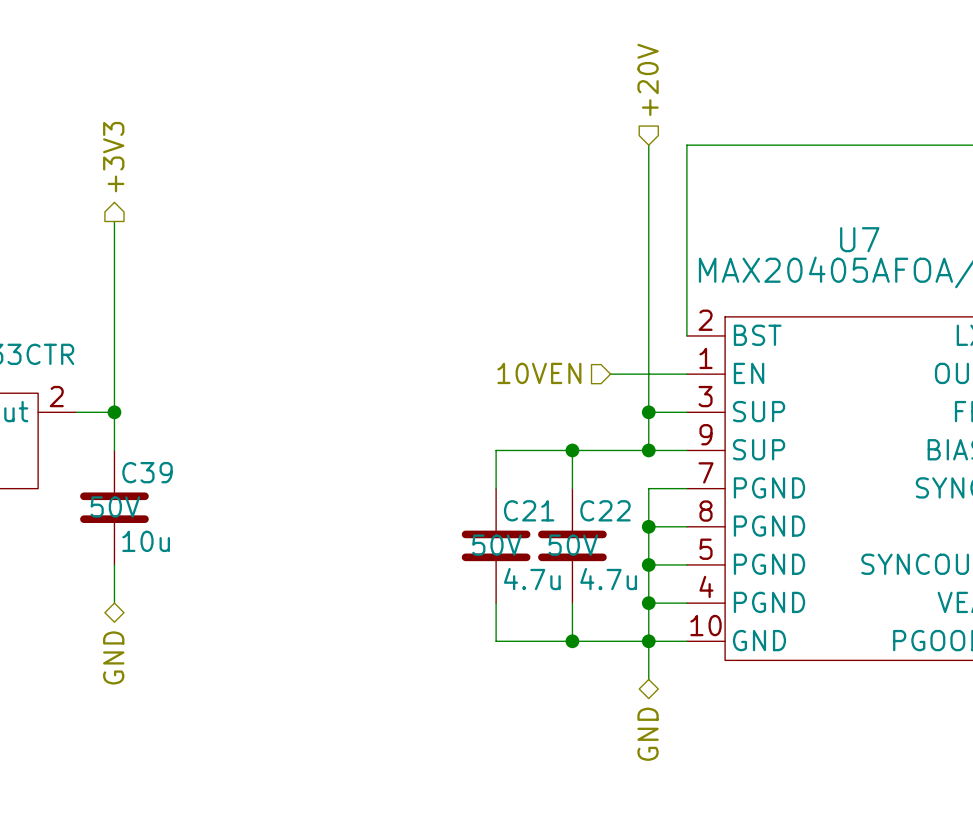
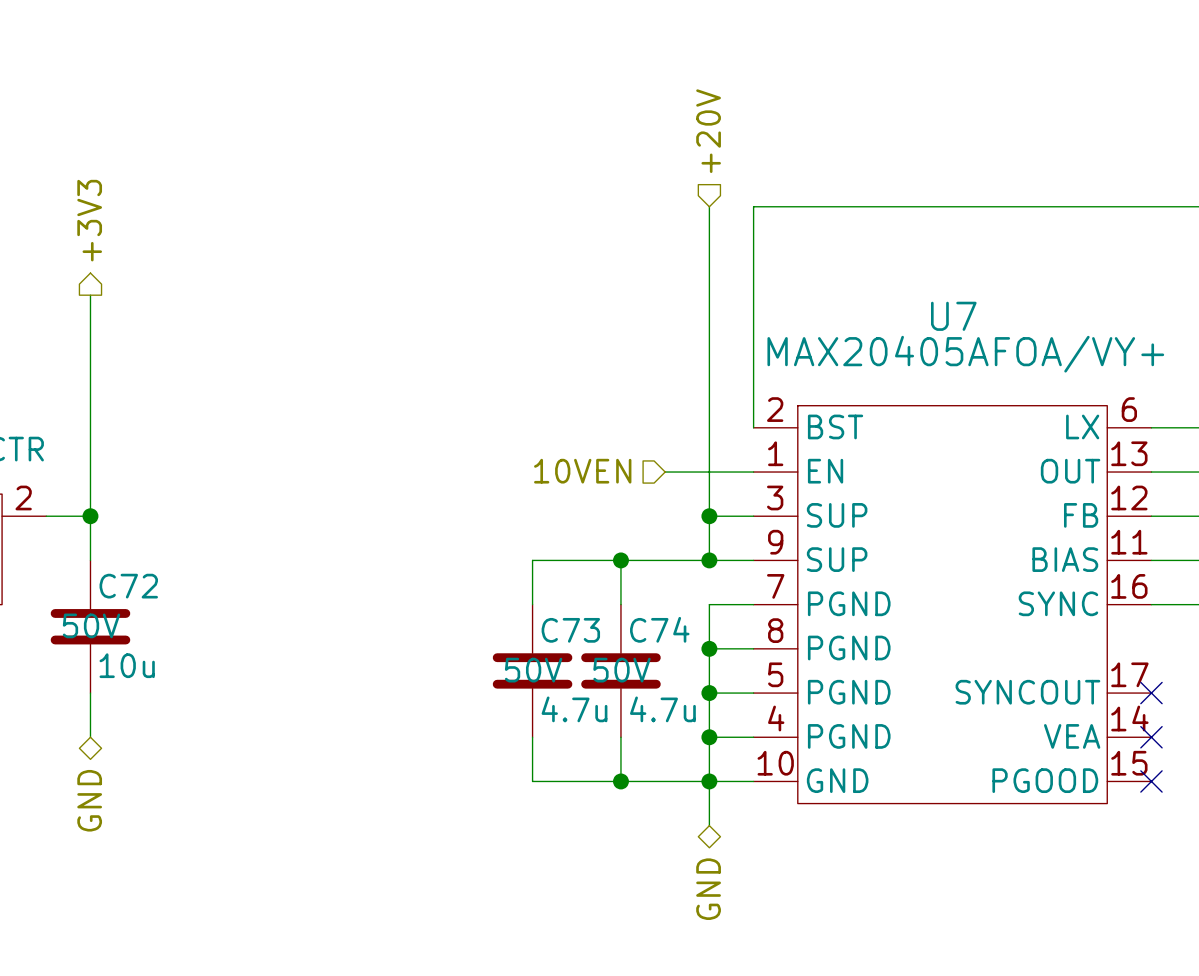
C39 name: C39 (147, 472) -> C72 (128, 586)
C21 name: C21 (529, 510) -> C73 (570, 630)
C22 name: C22 (605, 510) -> C74 (659, 629)

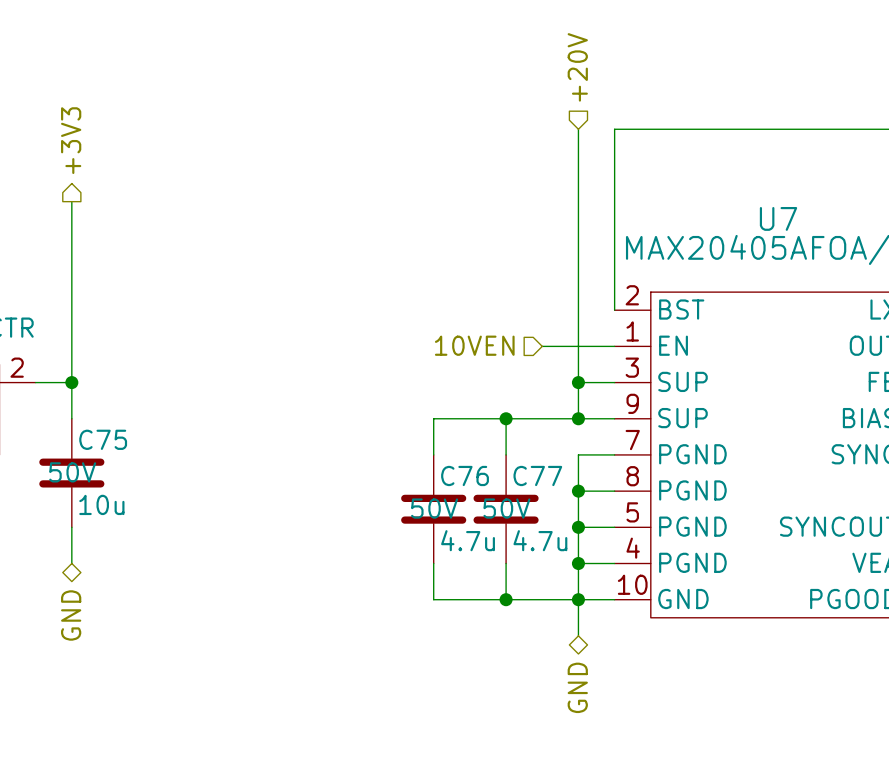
C72 name: C72 (128, 586) -> C75 (103, 439)
C74 name: C74 (659, 629) -> C77 (537, 475)
C73 name: C73 (570, 630) -> C76 (465, 475)

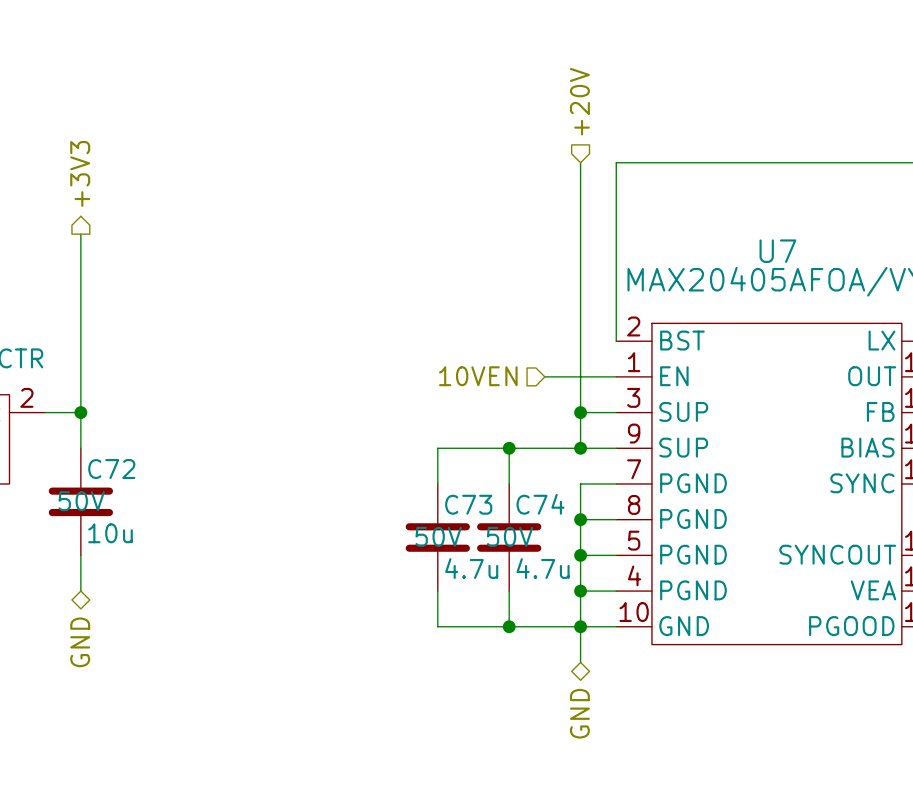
C75 name: C75 (103, 439) -> C72 (111, 469)
C76 name: C76 (465, 475) -> C73 (468, 504)
C77 name: C77 (537, 475) -> C74 (540, 504)

